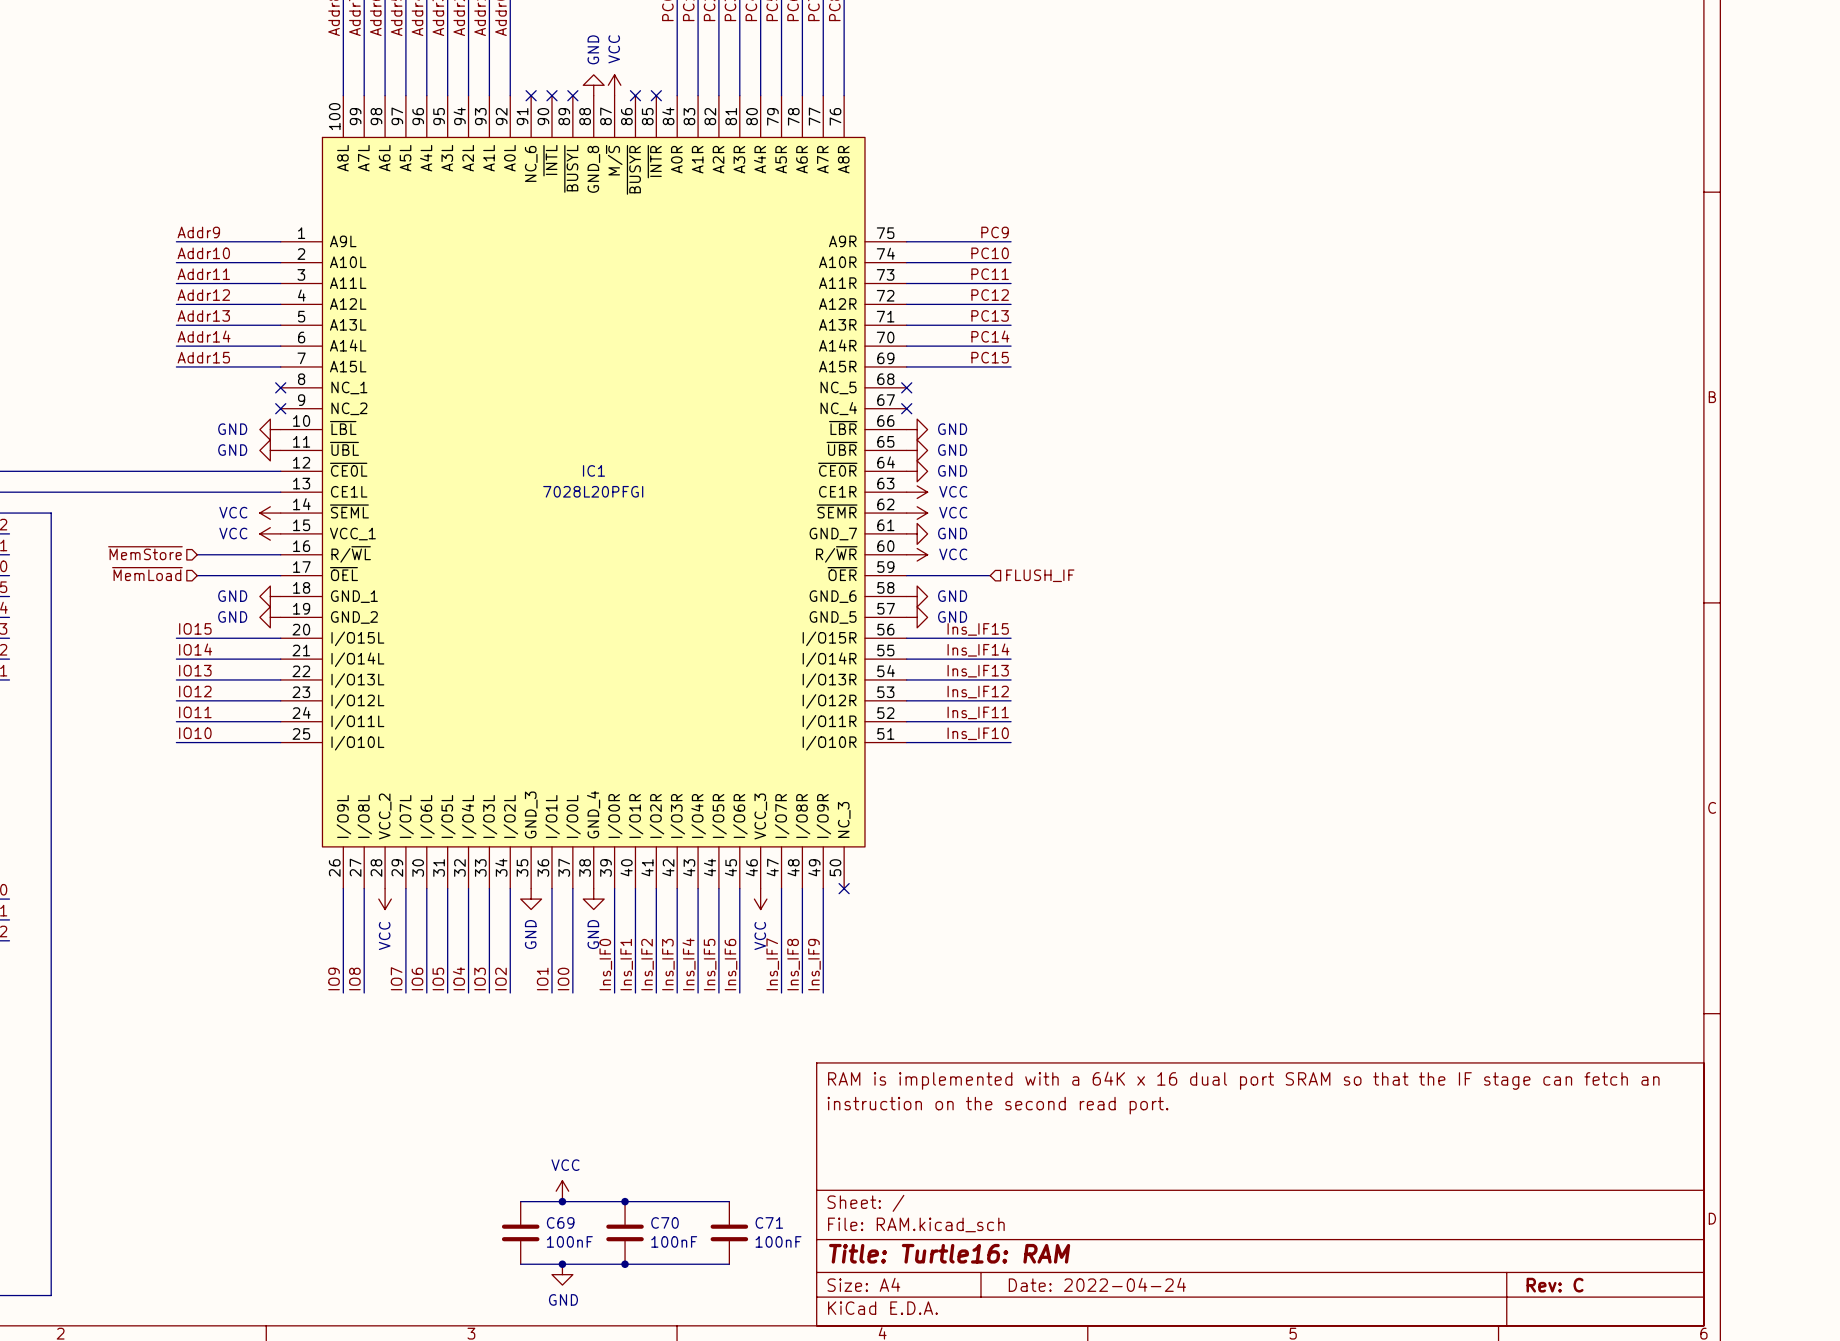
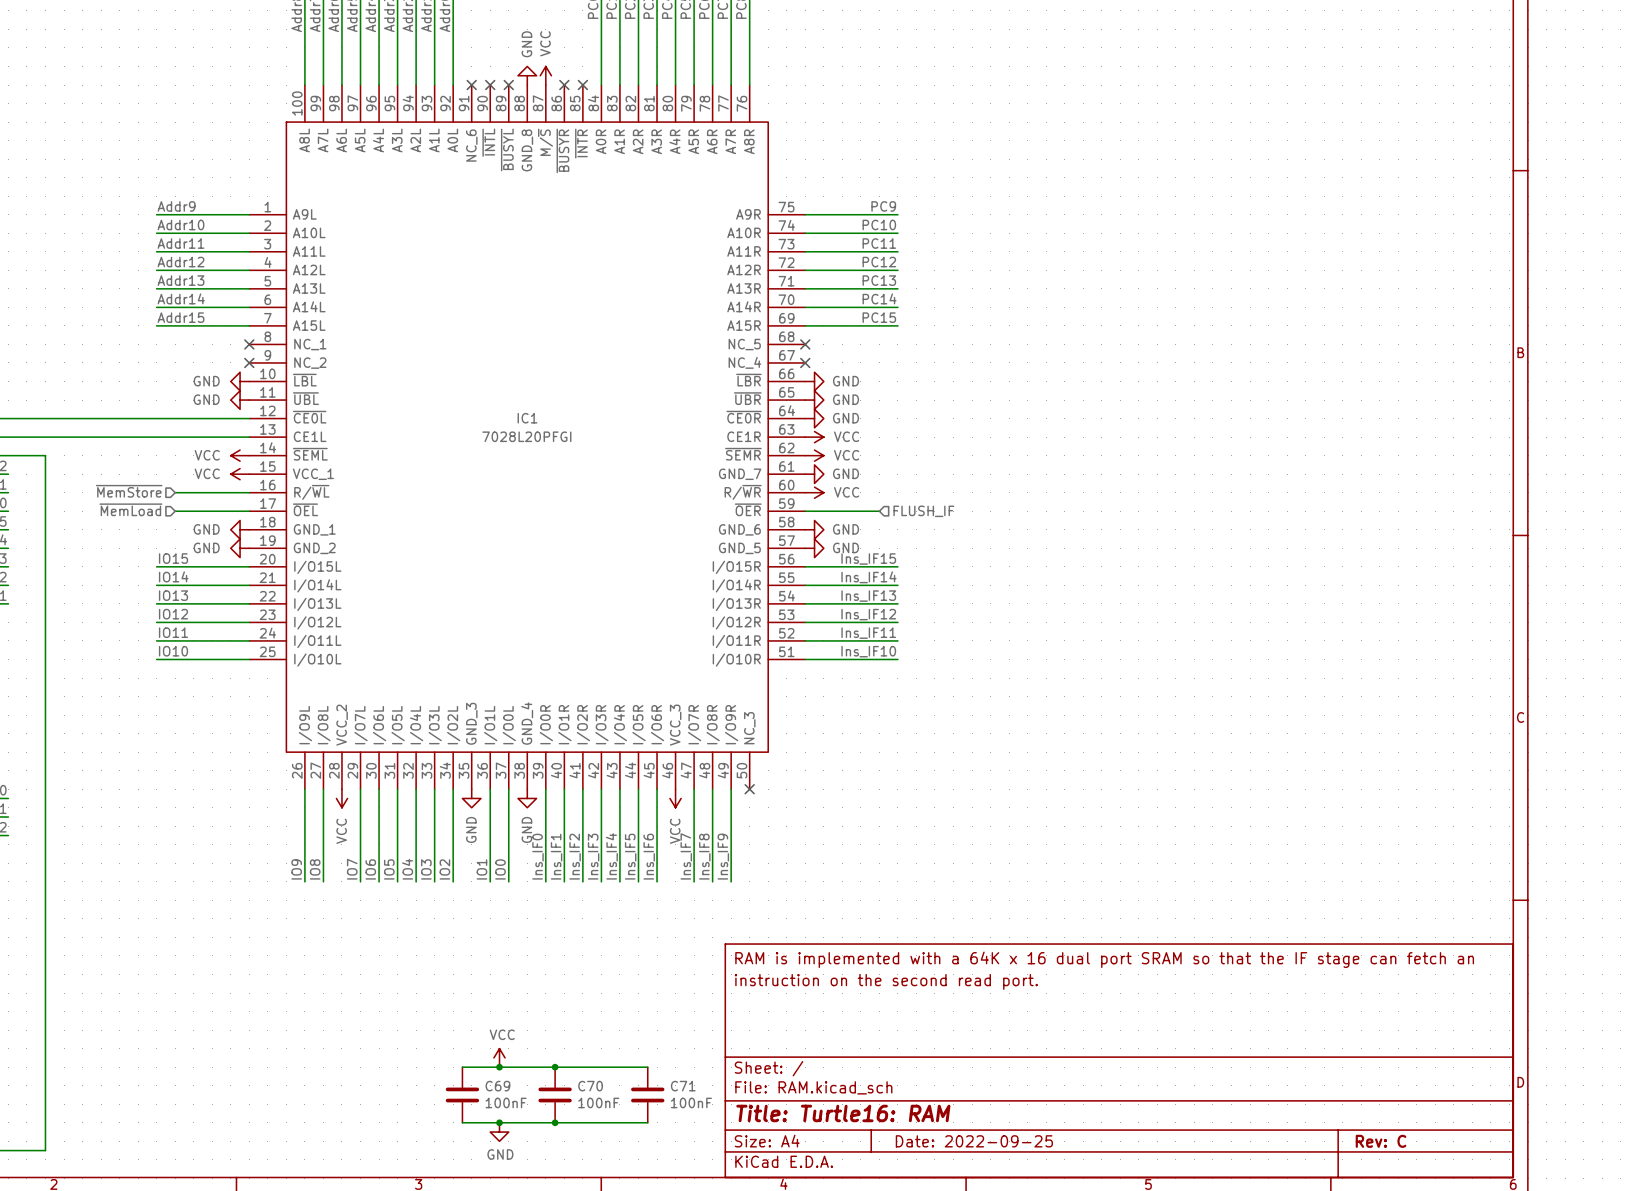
title block: Date: 2022-04-24 (1097, 1284) -> Date: 2022-09-25 (974, 1141)

